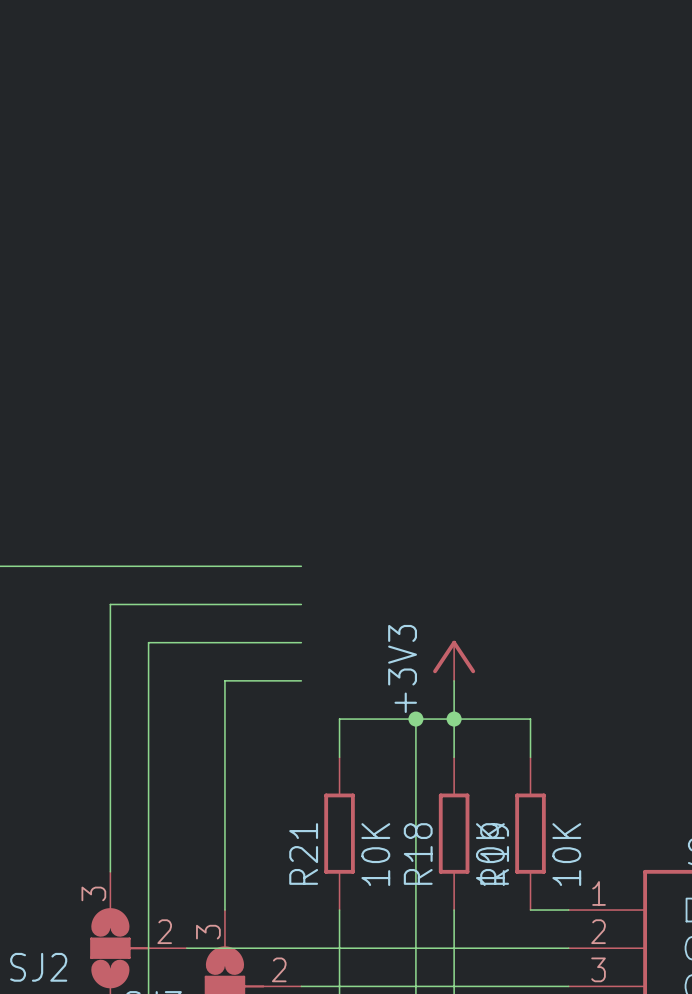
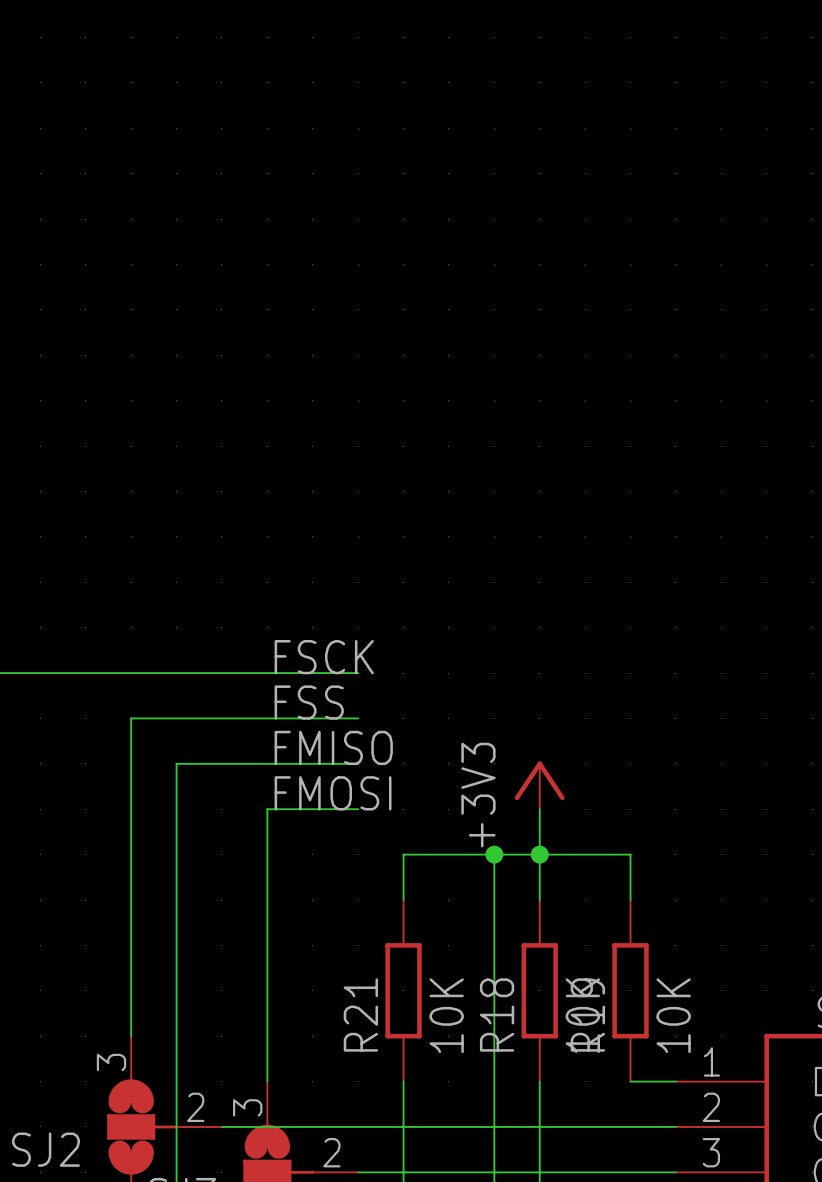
label: none -> FSCK (324, 657)
label: none -> FSS (309, 702)
label: none -> FMISO (333, 747)
label: none -> FMOSI (333, 793)

